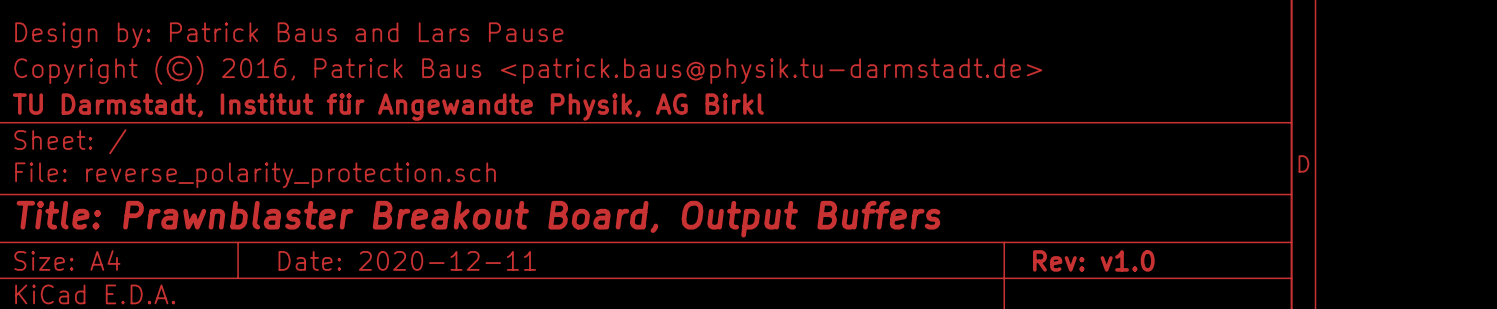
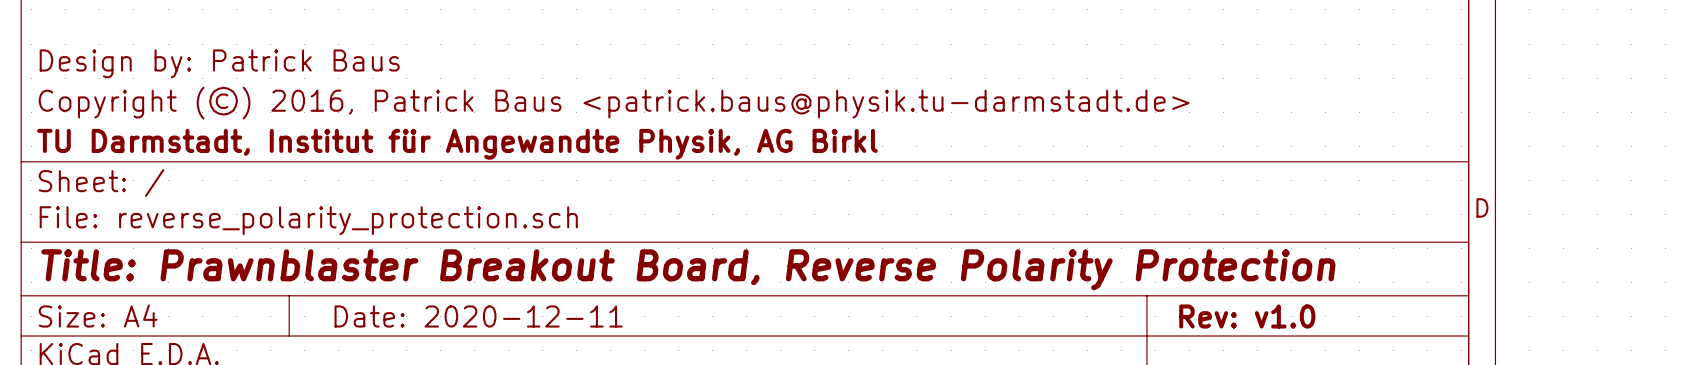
title block: Design by: Patrick Baus and Lars Pause (289, 35) -> Design by: Patrick Baus (219, 63)
title block: Title: Prawnblaster Breakout Board, Output Buffers (478, 219) -> Title: Prawnblaster Breakout Board, Reverse Polarity Protection (688, 269)

